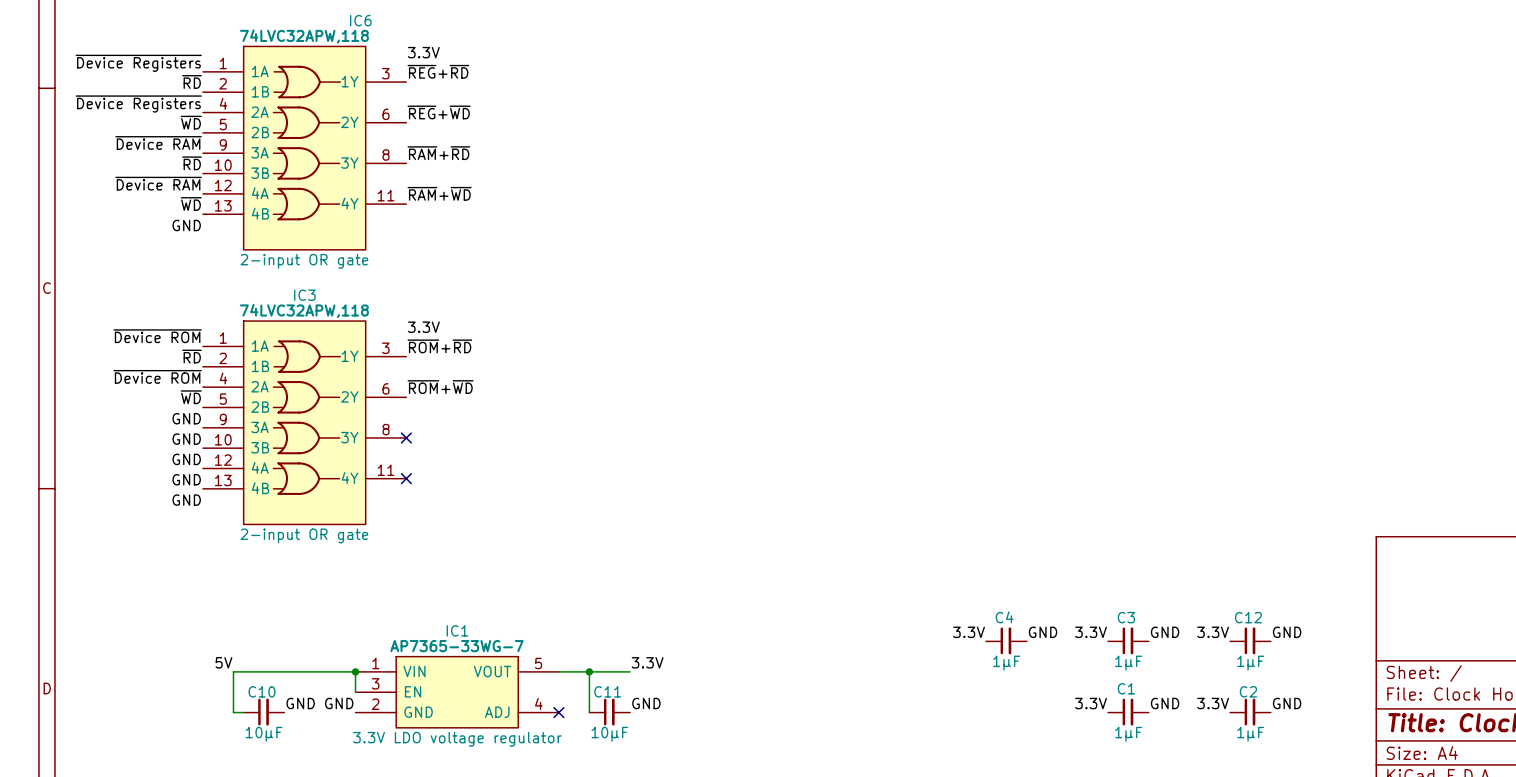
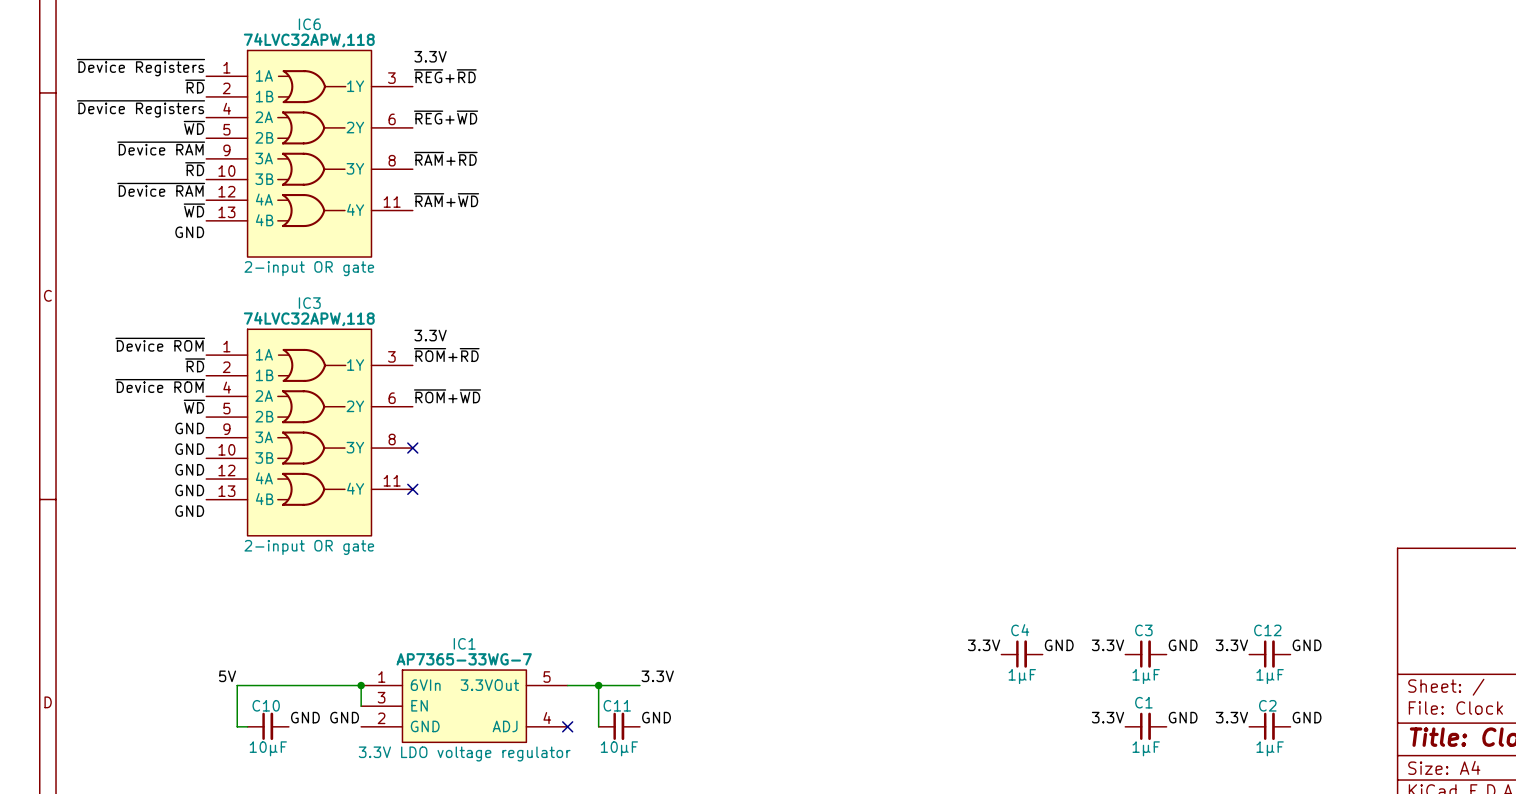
IC6 name position: IC6 (360, 20) -> IC6 (309, 24)
IC1 pin name: VIN (414, 671) -> 6VIn (425, 685)
IC1 pin name: VOUT (492, 671) -> 3.3VOut (489, 685)

